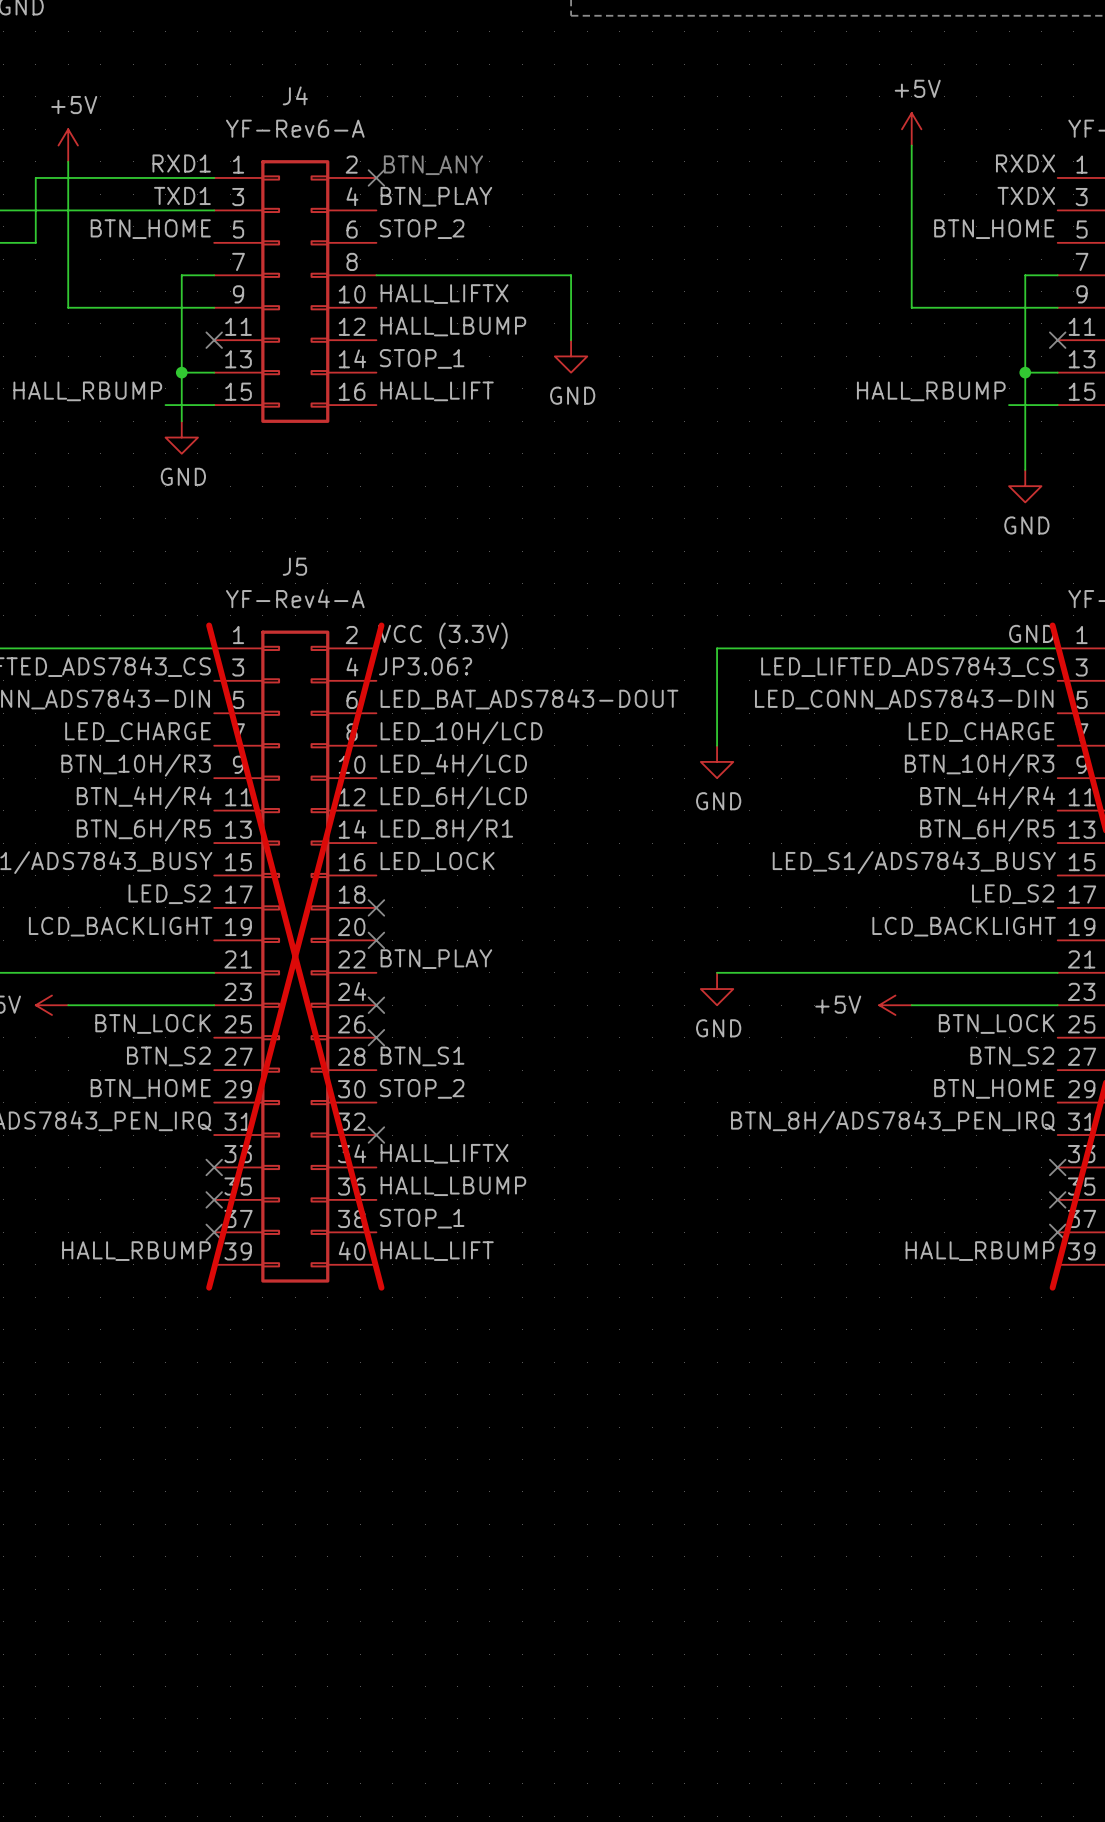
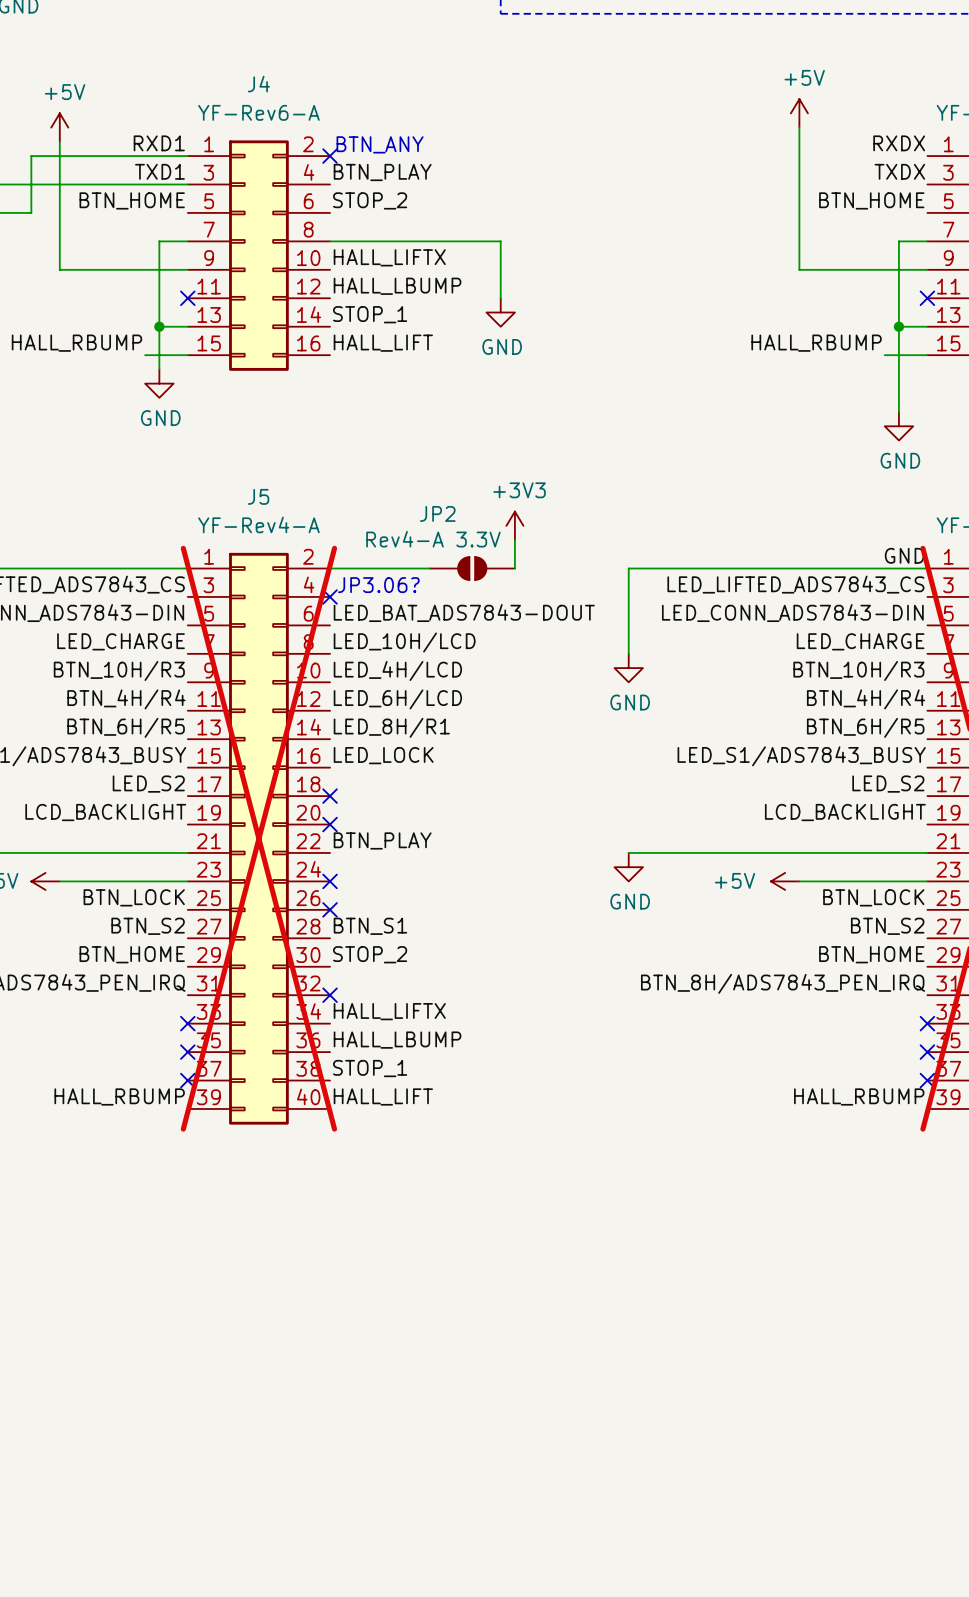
power symbol: none -> +3V3 (514, 525)
wire: none -> (514, 540) (514, 568)
label: VCC (3.3V) (442, 635) -> none
wire: none -> (330, 568) (429, 568)
JP2: none -> Rev4-A 3.3V (472, 568)
label: JP3.06? (425, 666) -> none
text: none -> JP3.06? (378, 585)
no-connect mark: none -> (330, 596)

